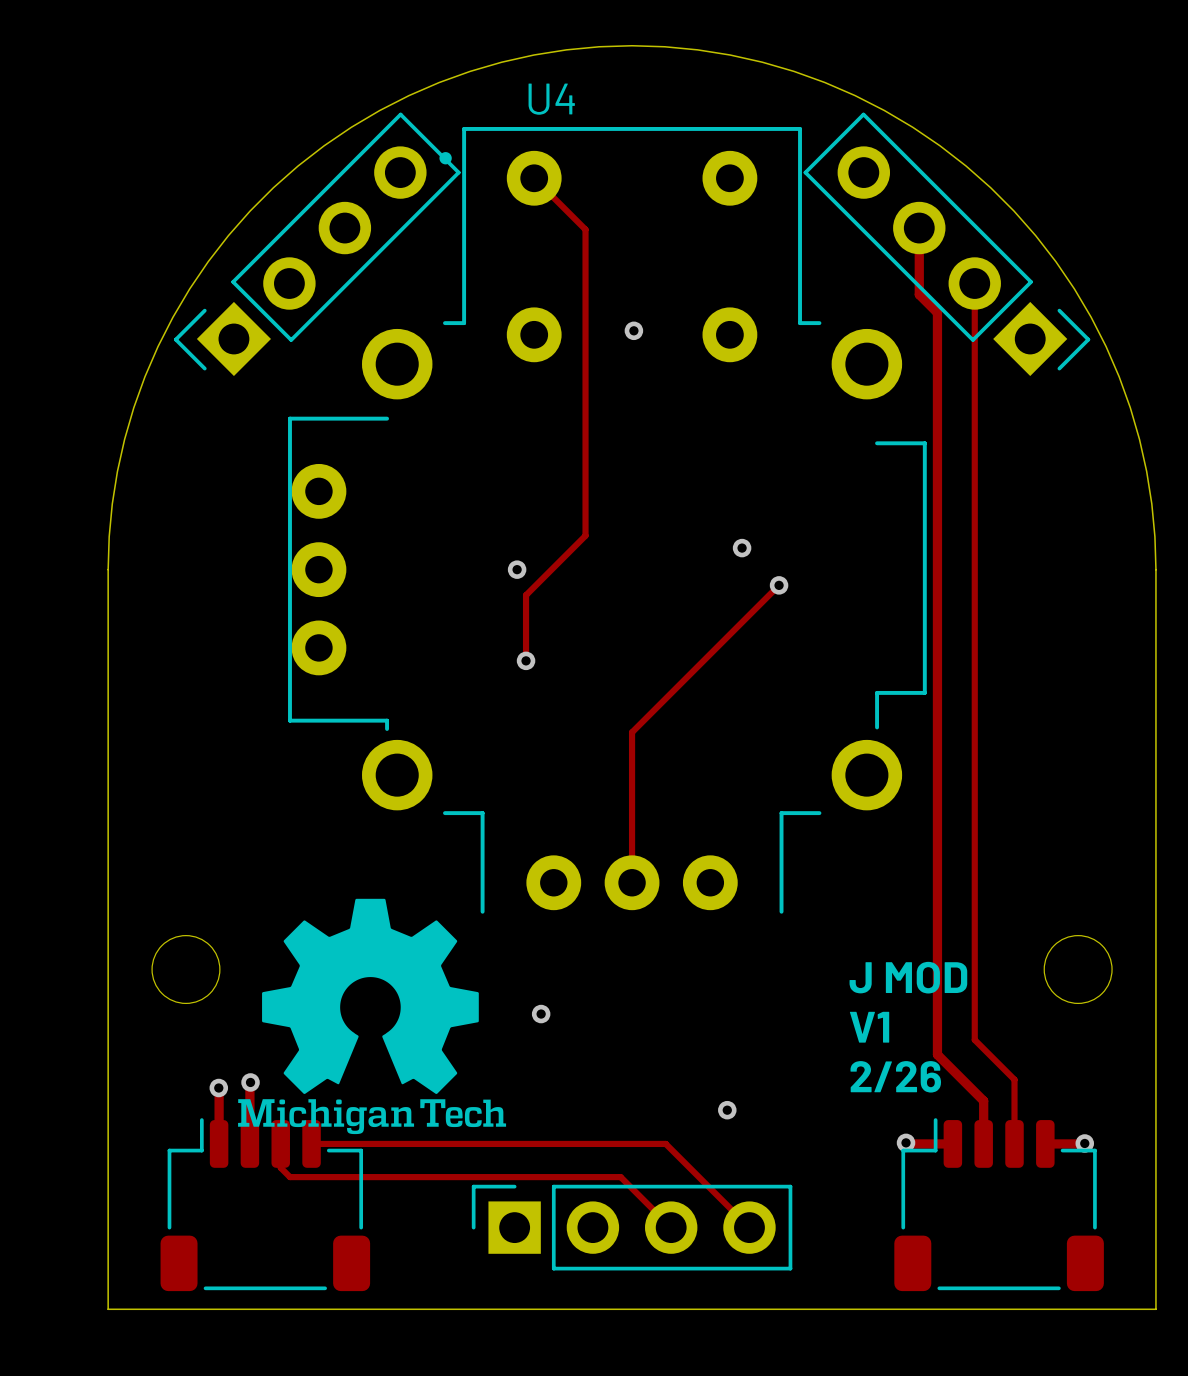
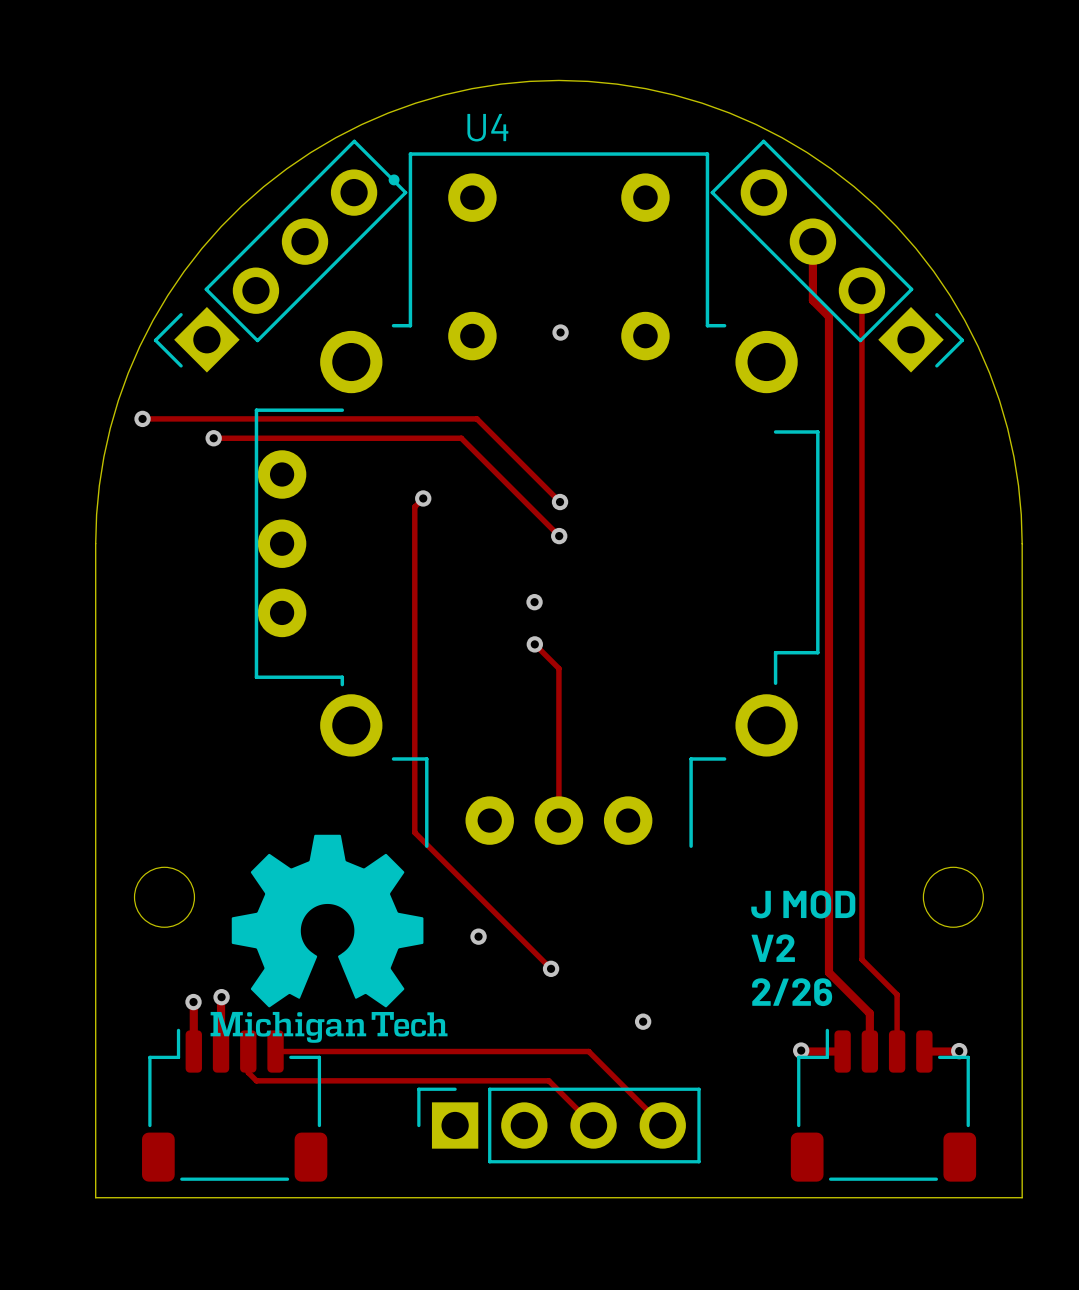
track: (534, 178) (585, 229) (585, 535) (526, 595) (526, 660) -> none
track: none -> (142, 418) (476, 418) (560, 502)
via: none -> (142, 418)
track: none -> (213, 438) (461, 438) (559, 536)
via: none -> (213, 438)
track: none -> (423, 498) (414, 506) (414, 832) (551, 968)
via: none -> (423, 498)
via: none -> (560, 502)
via: (742, 548) -> none
via: none -> (559, 536)
via: (517, 569) -> none
track: (779, 585) (632, 732) -> (534, 644) (558, 668) (558, 687)
via: (779, 585) -> none
via: none -> (534, 602)
via: (526, 660) -> none
via: none -> (534, 644)
text: V1 (869, 1027) -> V2 (773, 948)
via: none -> (551, 968)

